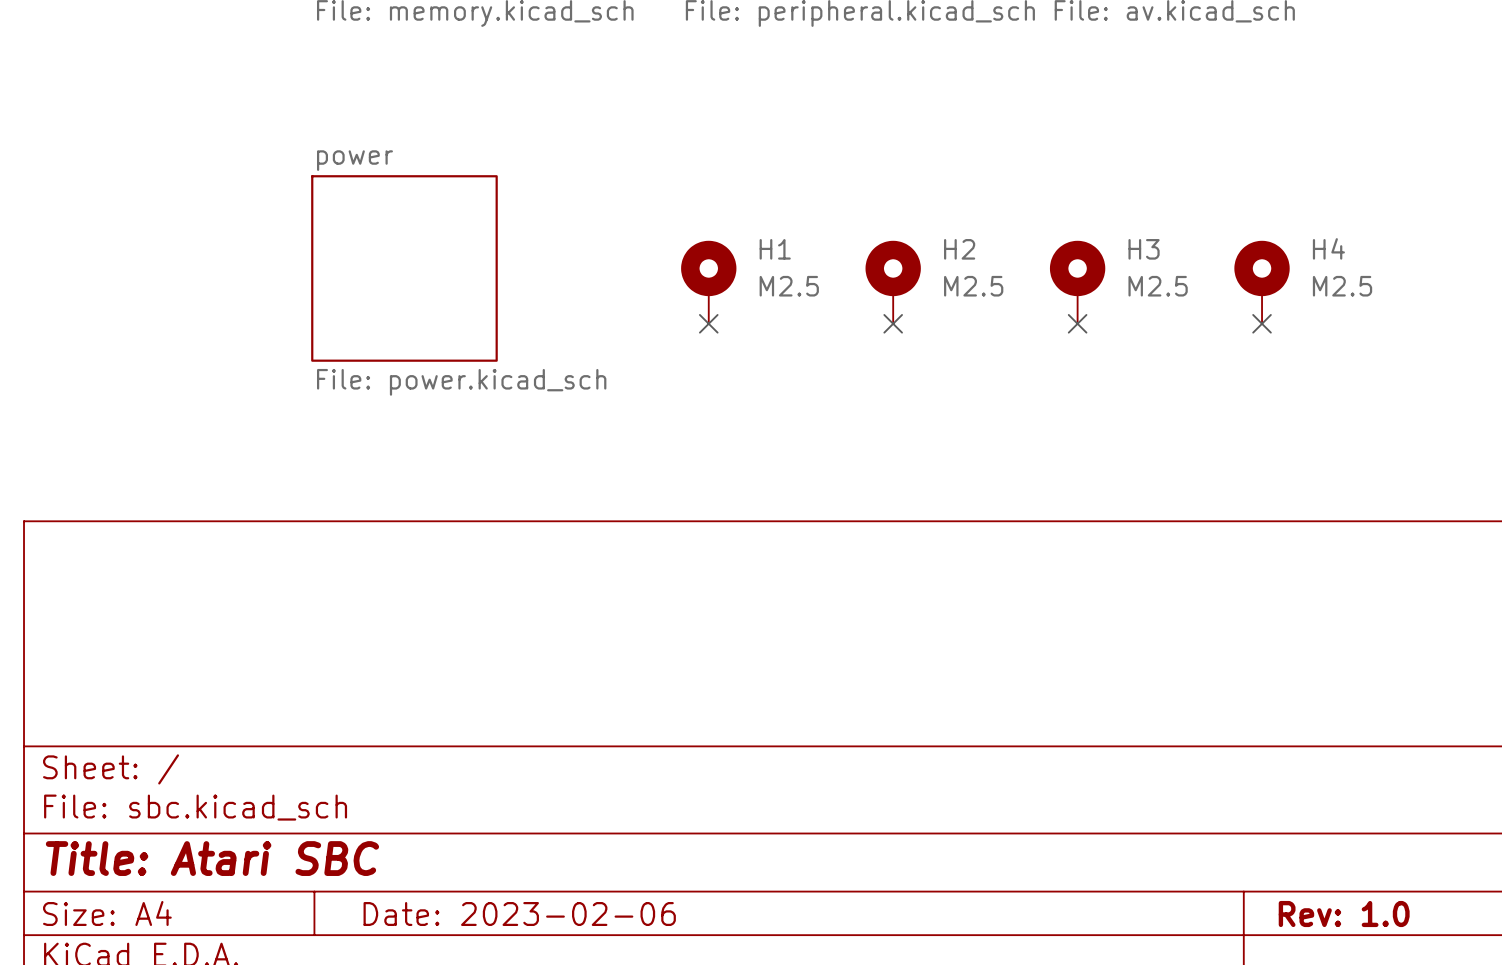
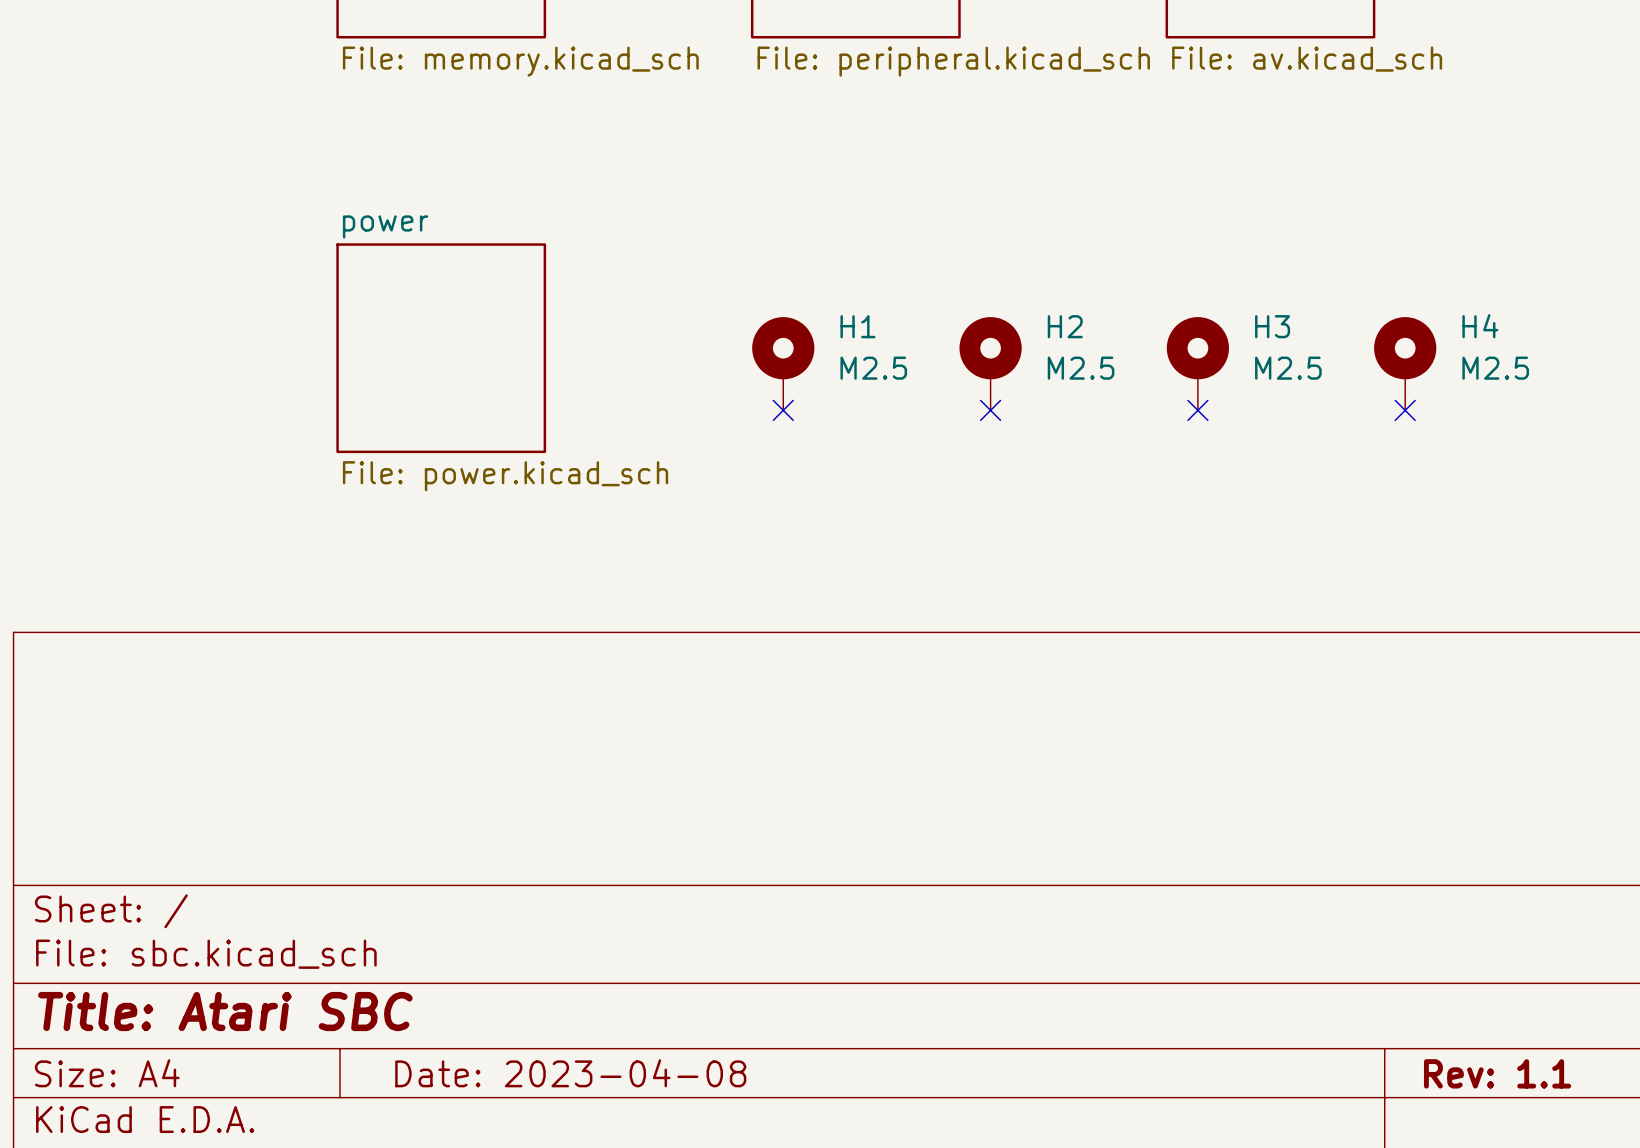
title block: Date: 2023-02-06 (519, 914) -> Date: 2023-04-08 (570, 1073)
title block: Rev: 1.0 (1344, 914) -> Rev: 1.1 (1497, 1073)

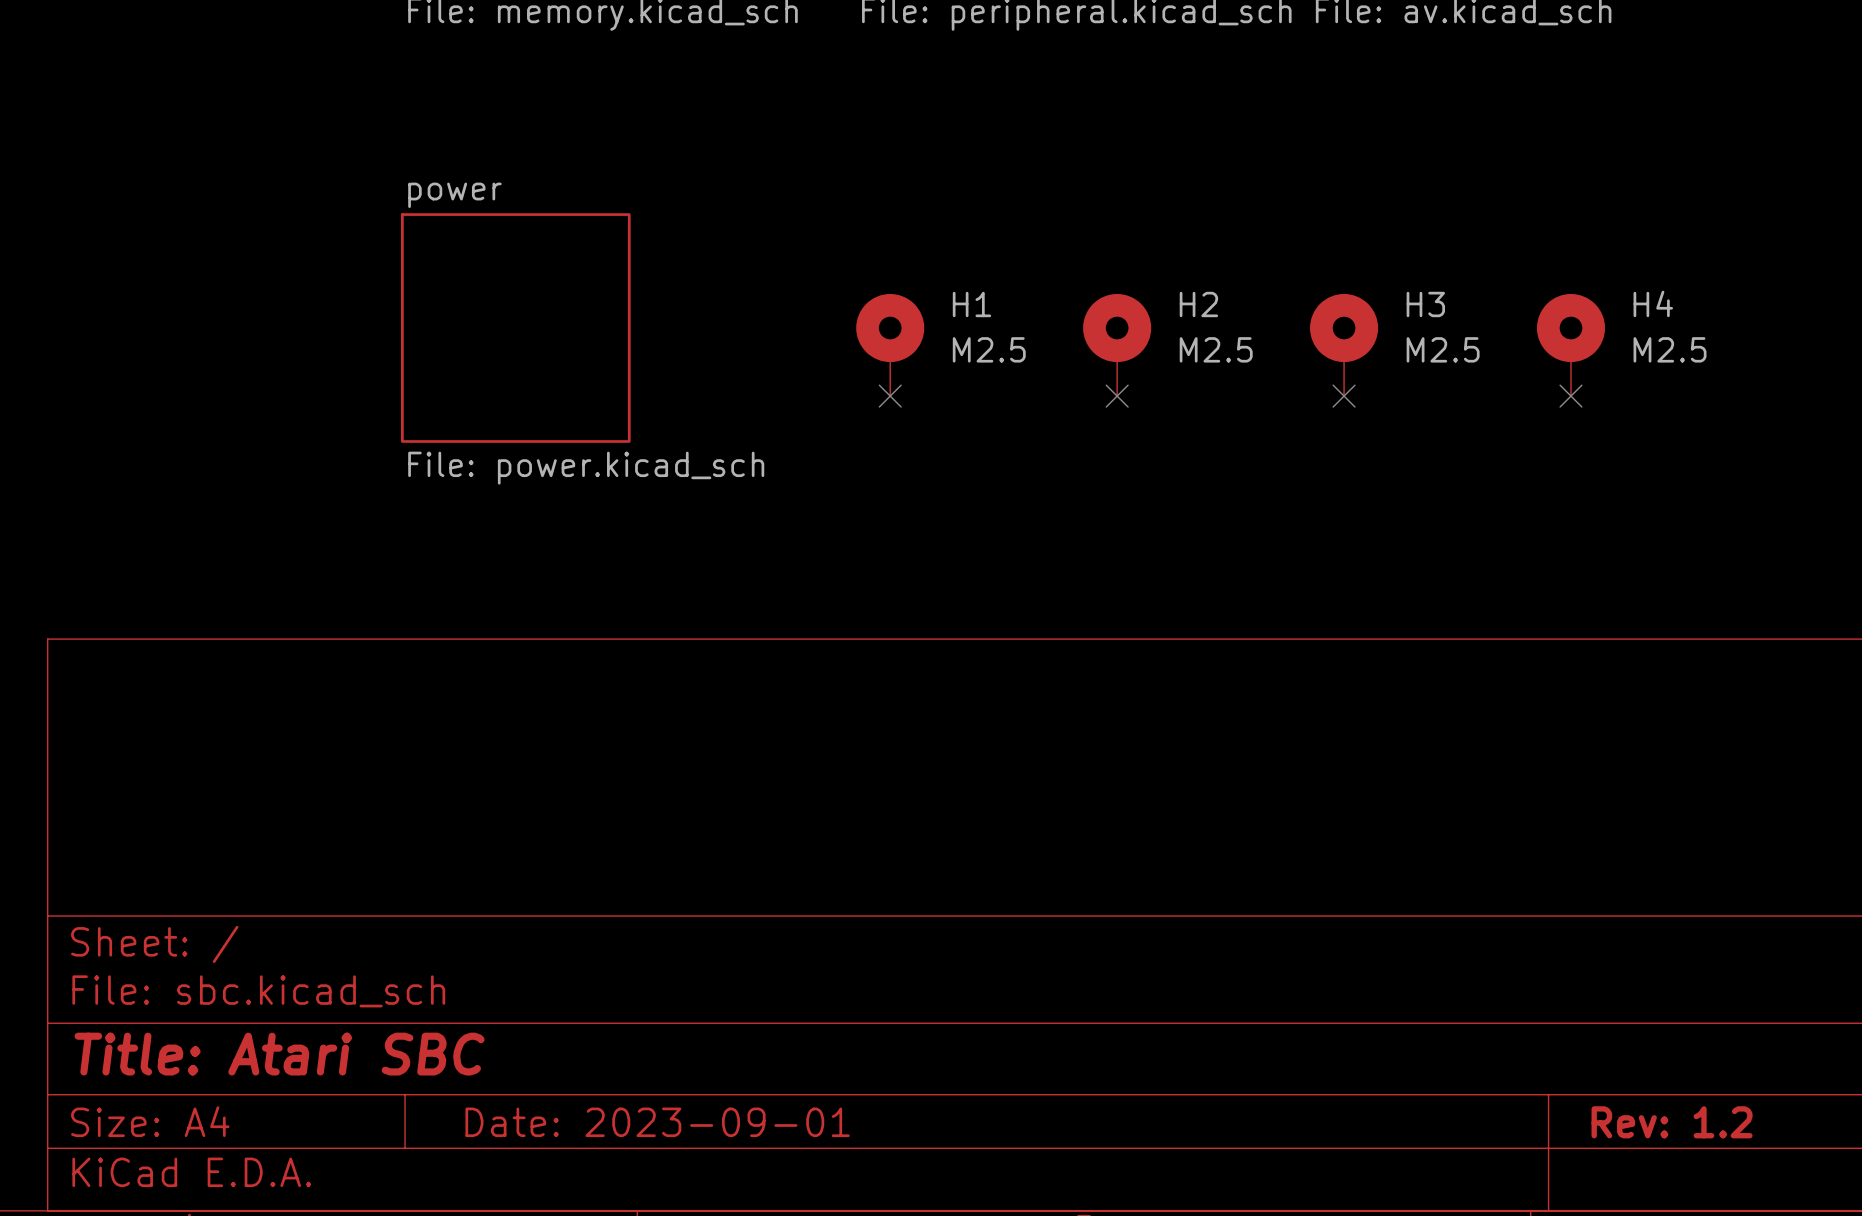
title block: Date: 2023-04-08 (570, 1073) -> Date: 2023-09-01 (657, 1122)
title block: Rev: 1.1 (1497, 1073) -> Rev: 1.2 (1672, 1122)

